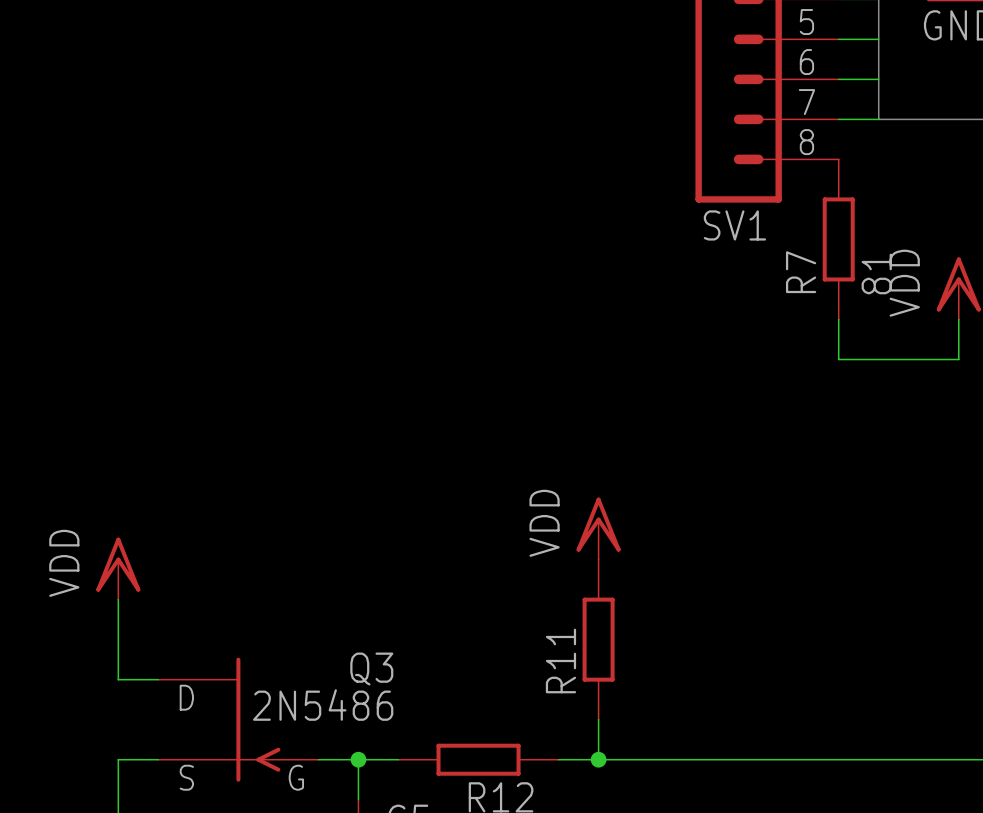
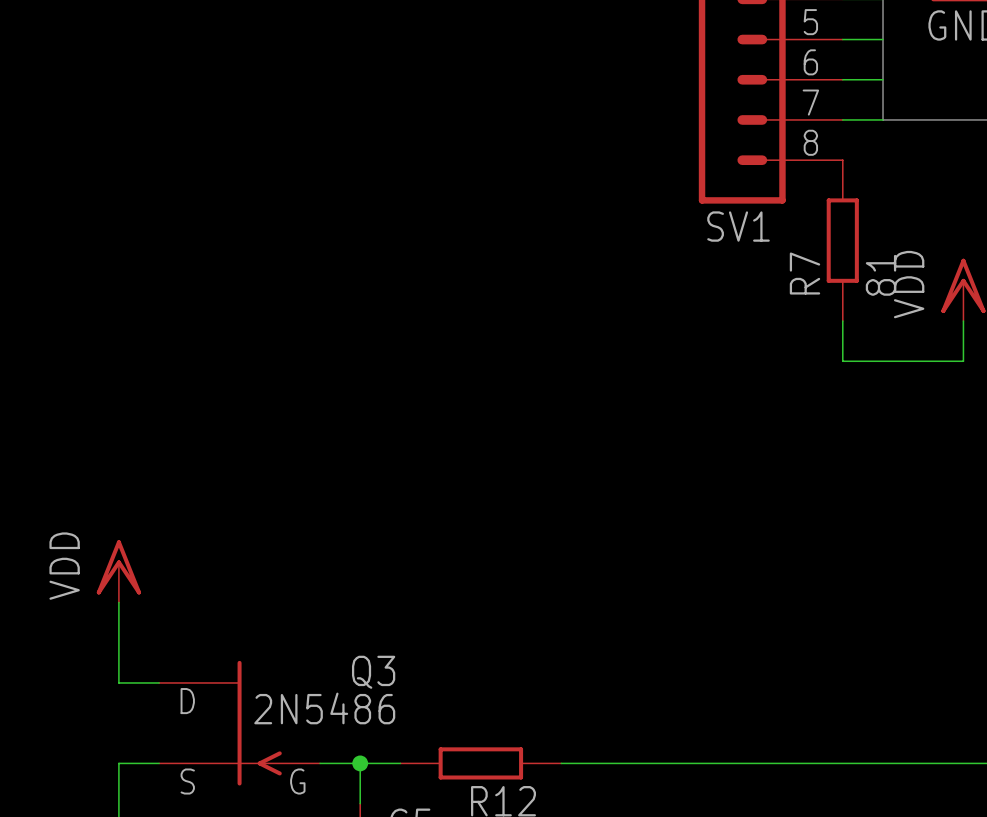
power symbol: VDD (598, 528) -> none
R11: (598, 639) -> none
wire: (598, 719) (598, 759) -> none
junction: (598, 759) -> none

